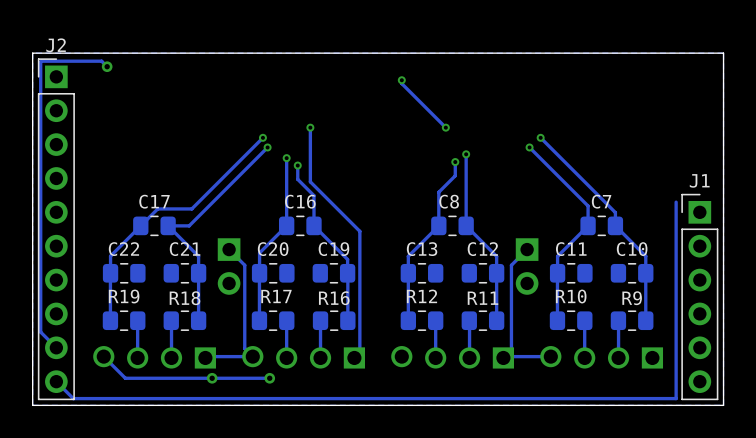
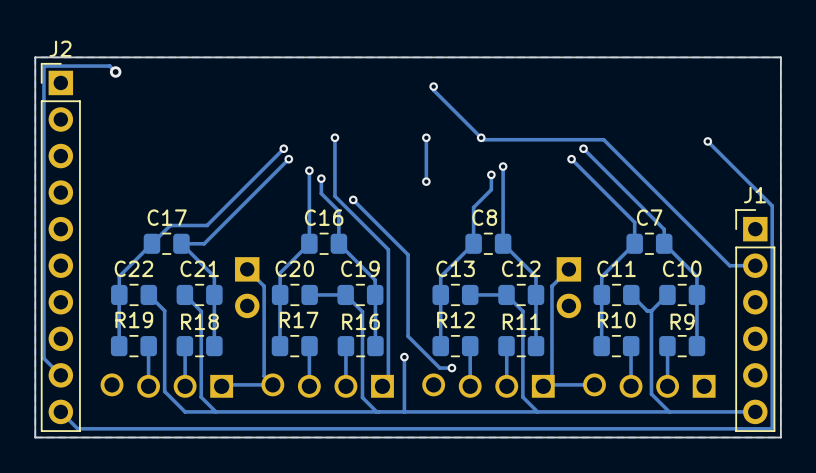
track: none -> (426, 137) (426, 181)
via: none -> (426, 137)
track: none -> (481, 137) (483, 139) (603, 139) (729, 265) (755, 265)
via: none -> (707, 141)
via: none -> (426, 181)
track: none -> (353, 199) (408, 254) (408, 336) (439, 368) (451, 368)
via: none -> (353, 199)
track: (676, 202) (676, 398) (72, 397) -> (707, 141) (772, 205) (771, 428) (77, 428)
track: none -> (148, 294) (164, 310) (164, 391) (185, 411) (755, 411)
track: none -> (184, 294) (201, 311) (201, 397) (215, 411)
track: none -> (309, 294) (345, 294) (362, 311) (362, 397) (376, 411)
track: none -> (470, 294) (506, 294) (522, 311) (522, 397) (537, 411)
track: none -> (631, 294) (647, 310) (651, 310)
track: none -> (667, 294) (651, 310)
track: none -> (651, 310) (651, 394) (669, 411)
track: none -> (404, 357) (404, 411)
via: none -> (404, 357)
via: none -> (451, 368)
track: (103, 356) (125, 378) (269, 378) -> none
via: (212, 378) -> none
via: (269, 378) -> none

